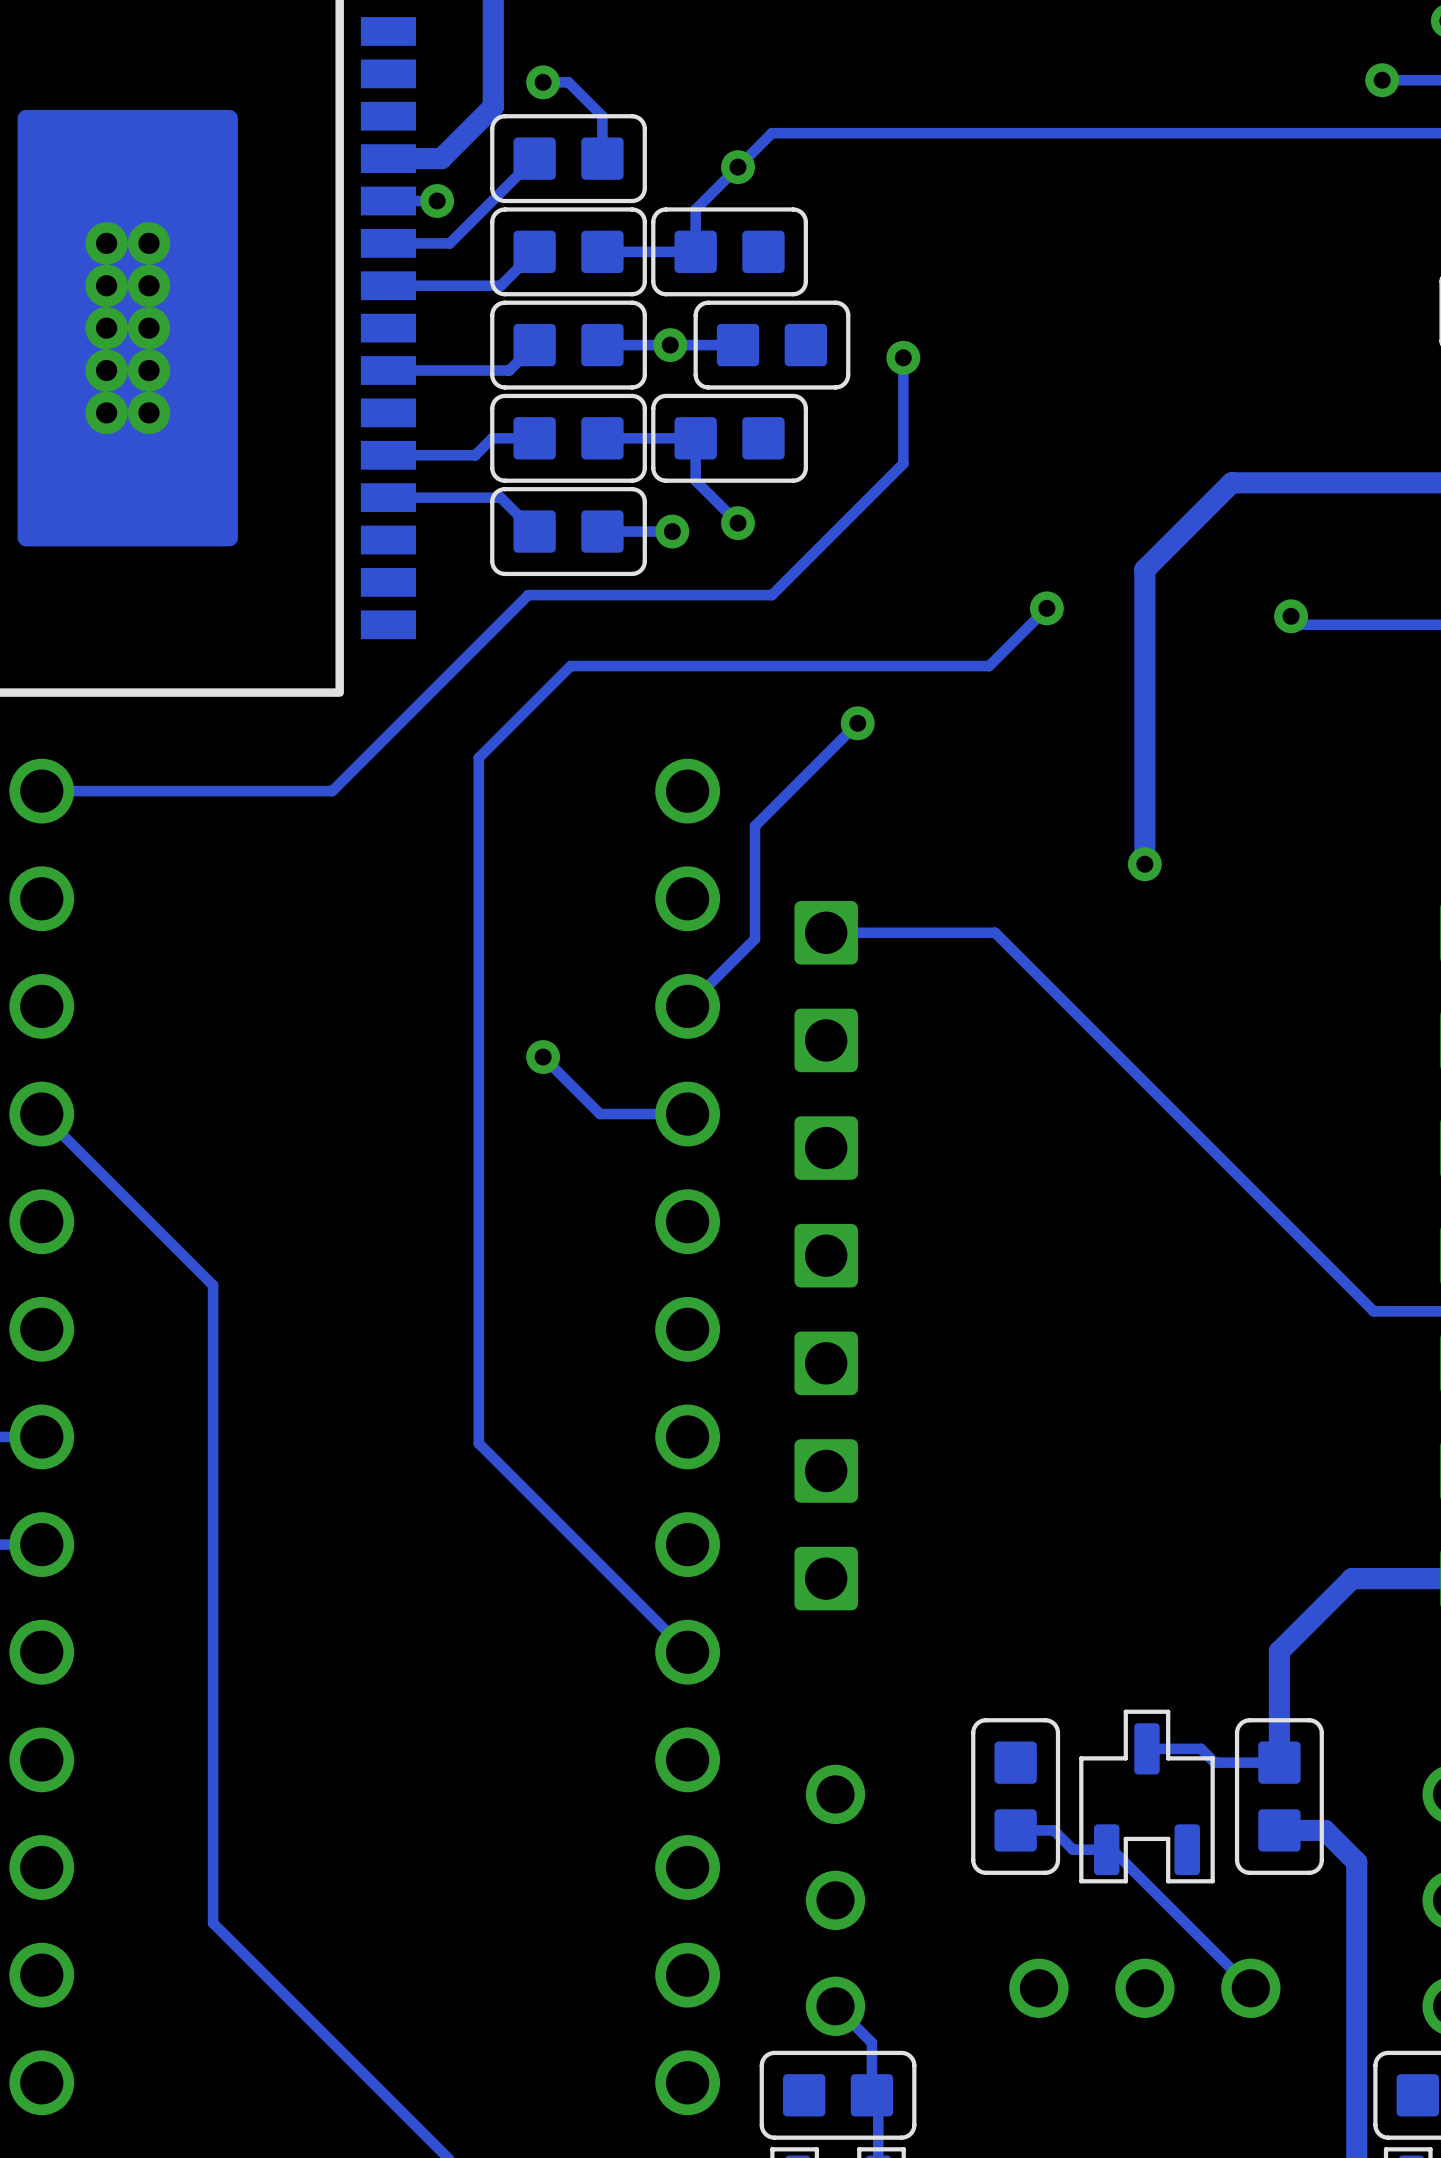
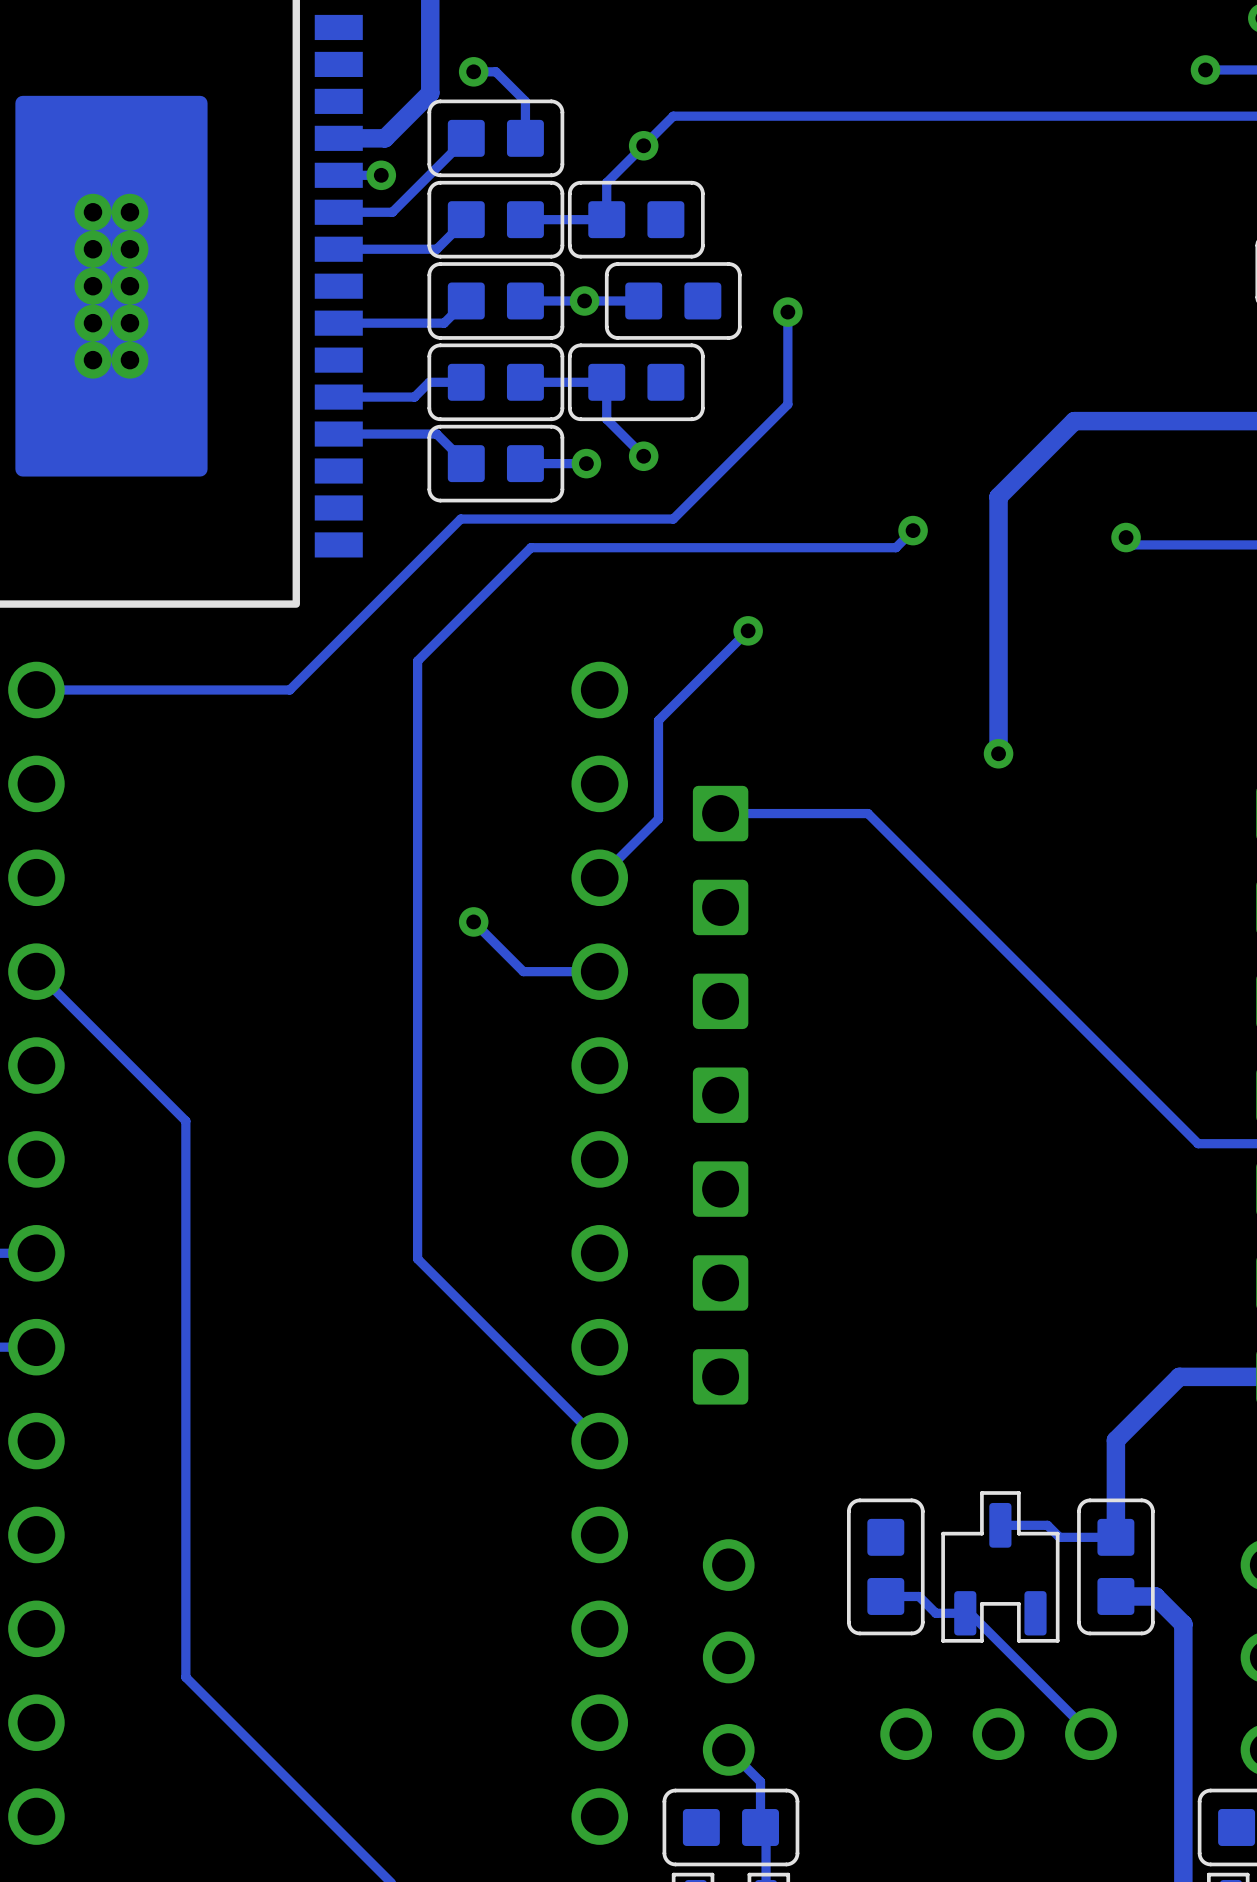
track: (1027, 627) (989, 666) (570, 666) -> (895, 547) (530, 547) (497, 580)

